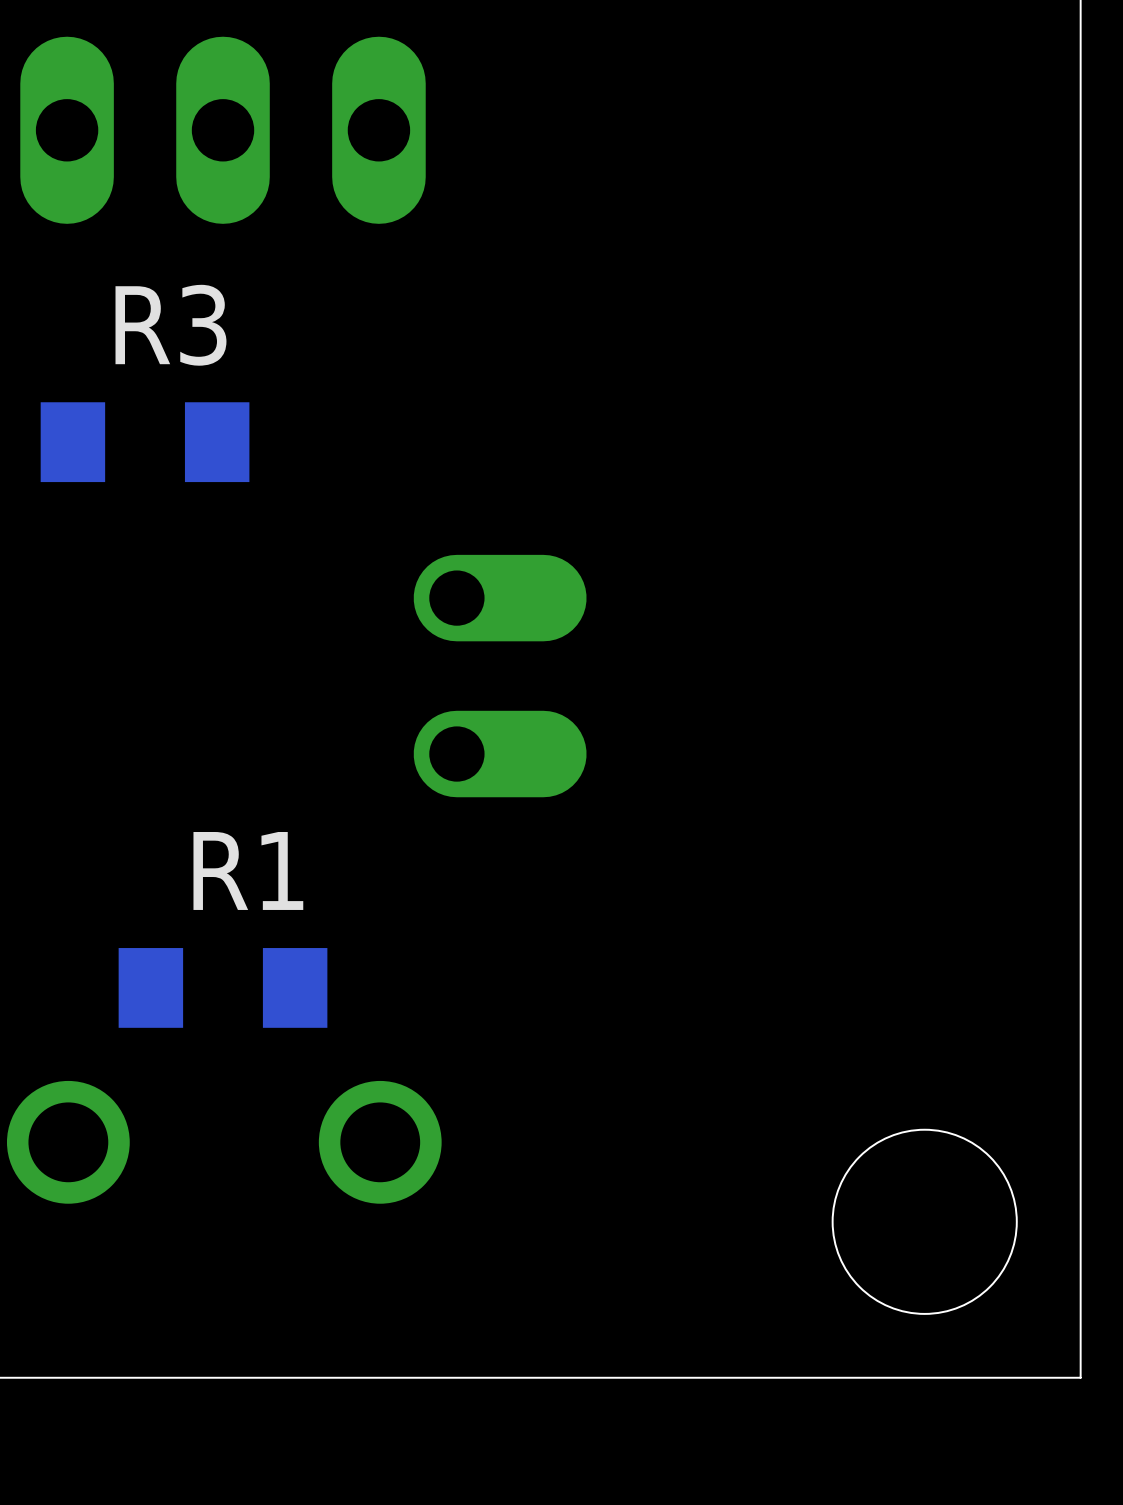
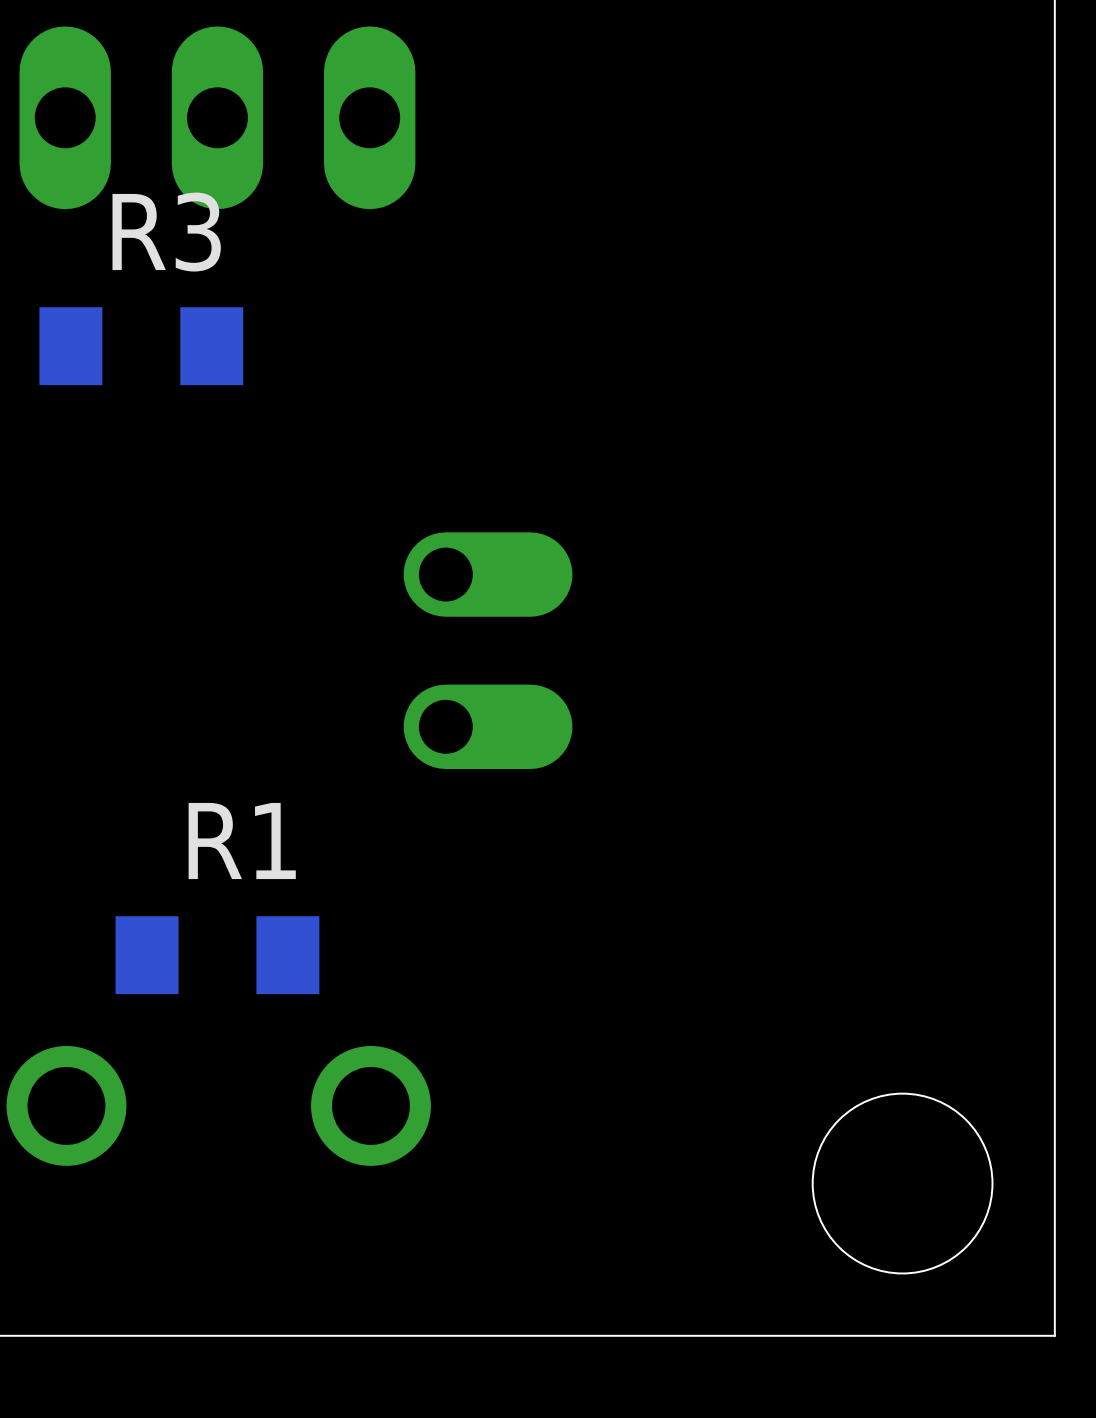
R3 position: (145, 442) -> (141, 346)

